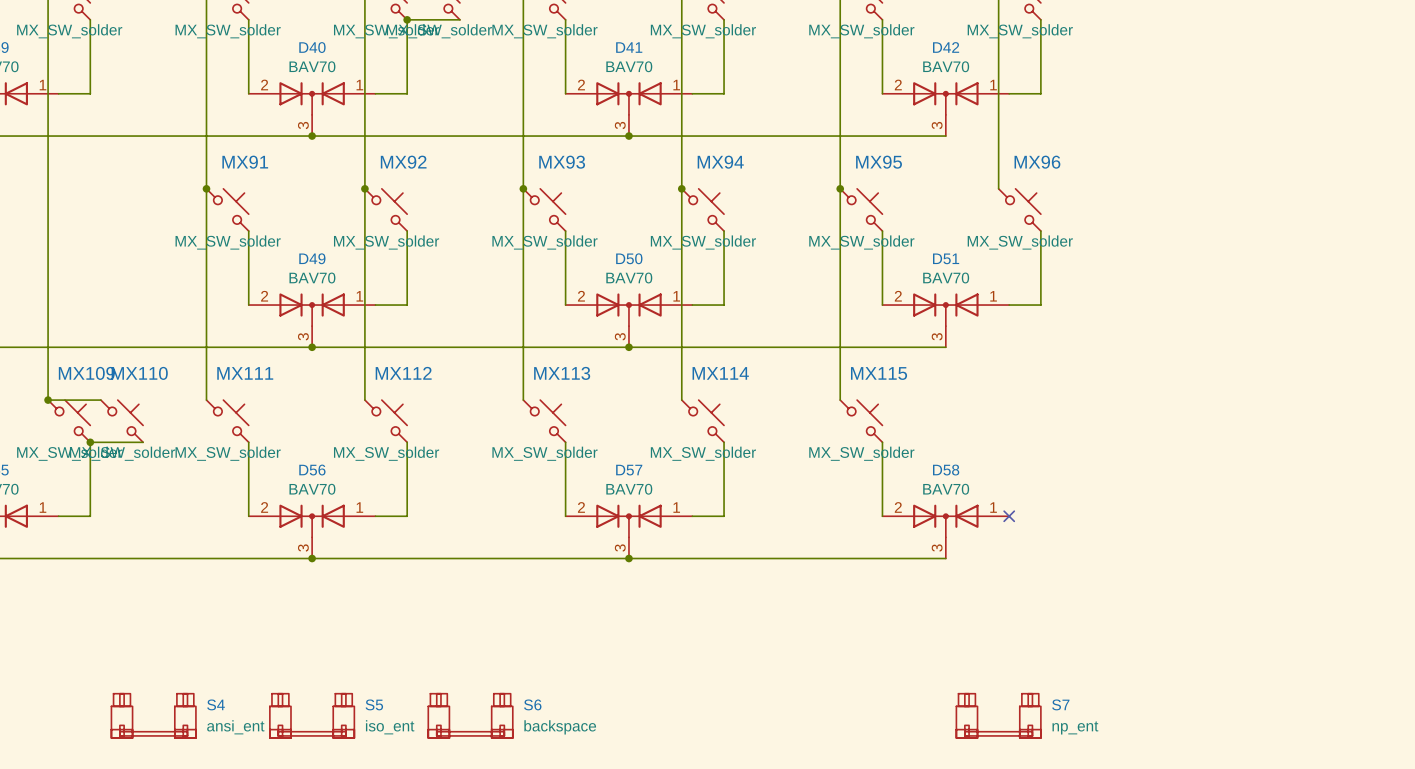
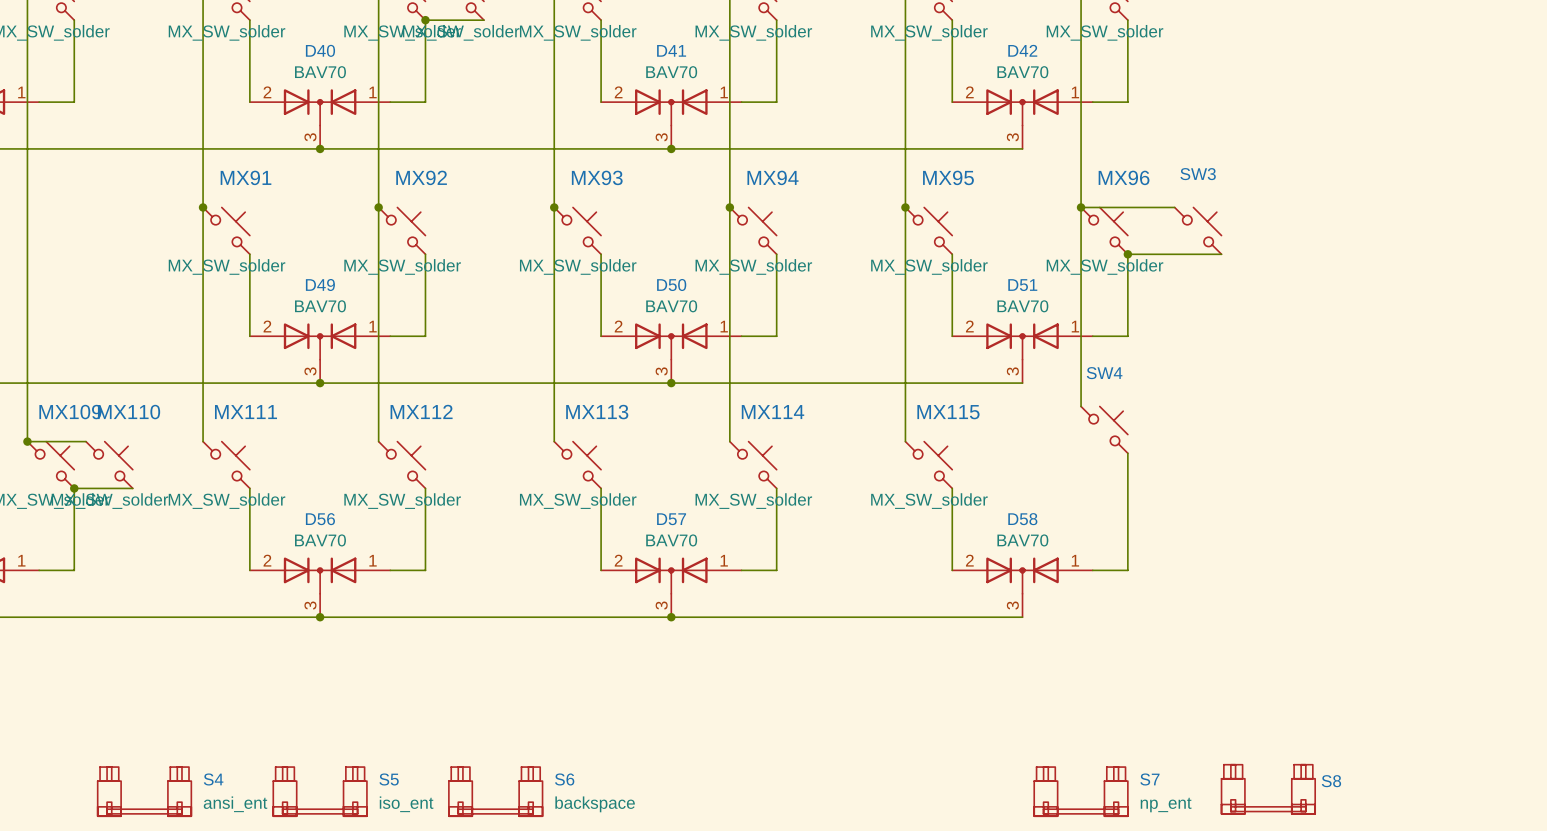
junction: none -> (1081, 207)
wire: none -> (1174, 207) (1081, 207) (1081, 406)
SW3: none -> (1198, 230)
wire: none -> (1127, 254) (1221, 254)
junction: none -> (1127, 254)
SW4: none -> (1104, 429)
wire: none -> (1127, 453) (1127, 570) (1092, 570)
no-connect mark: (1009, 516) -> none
S8: none -> (1268, 789)

